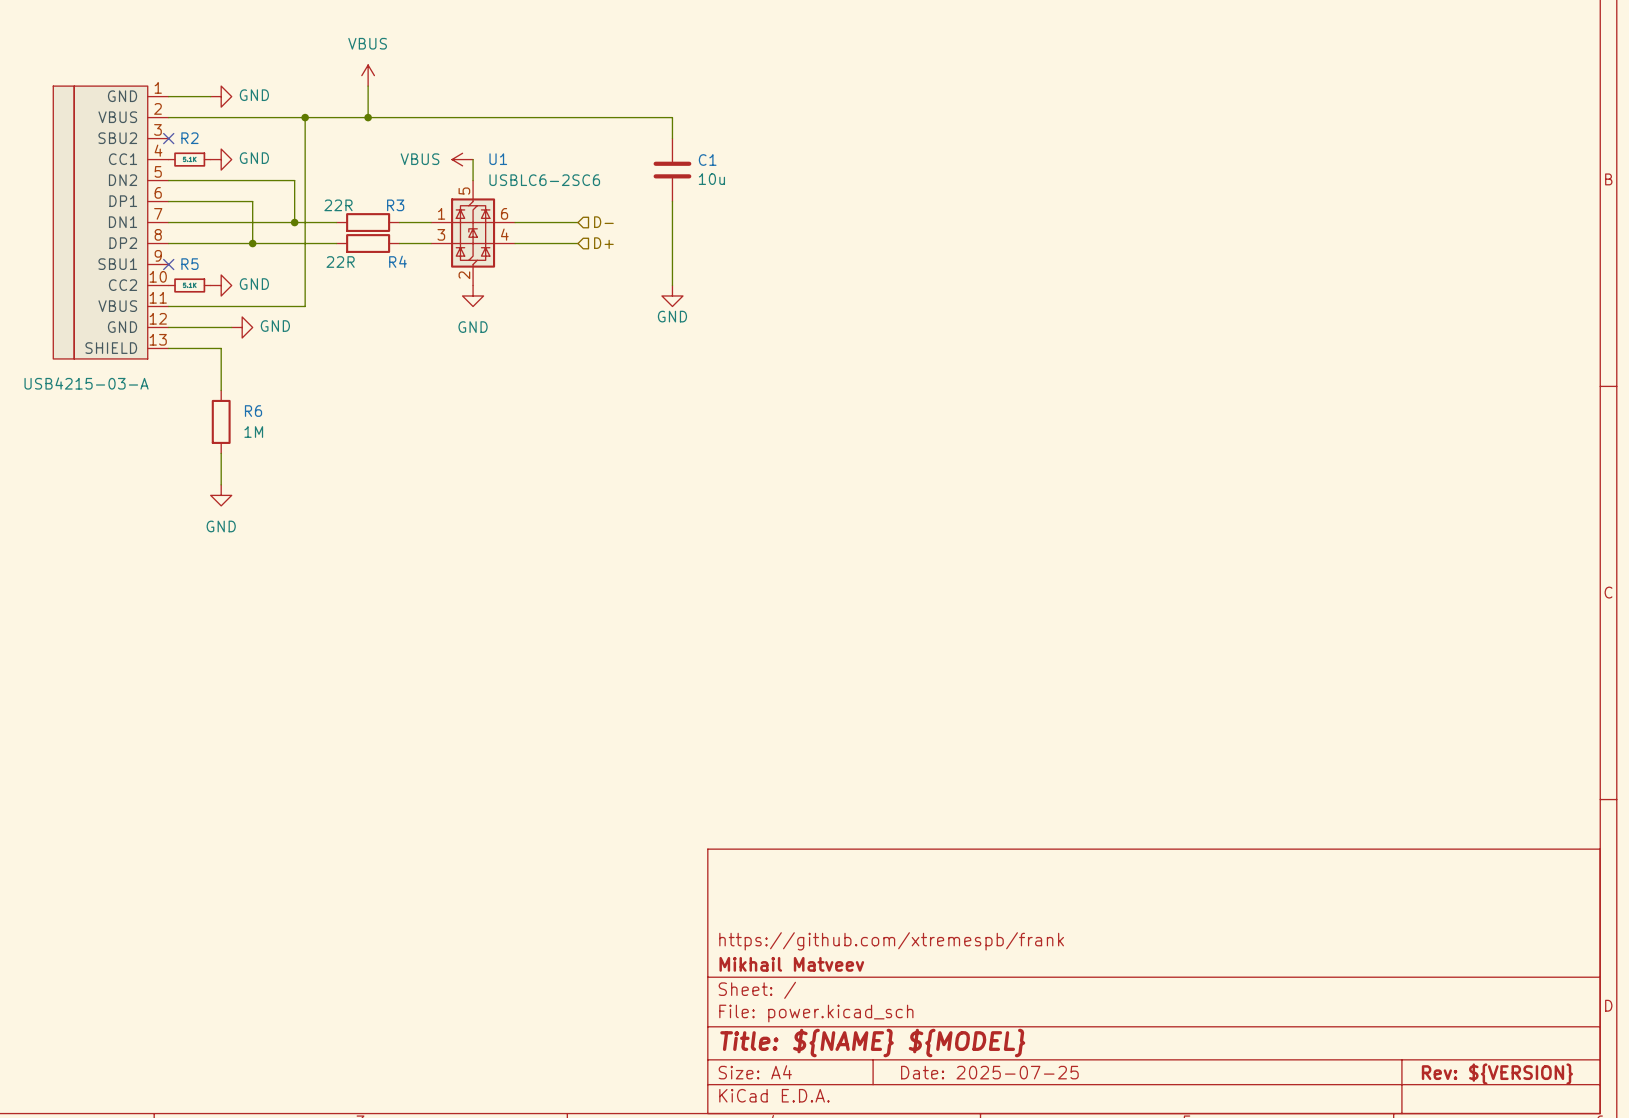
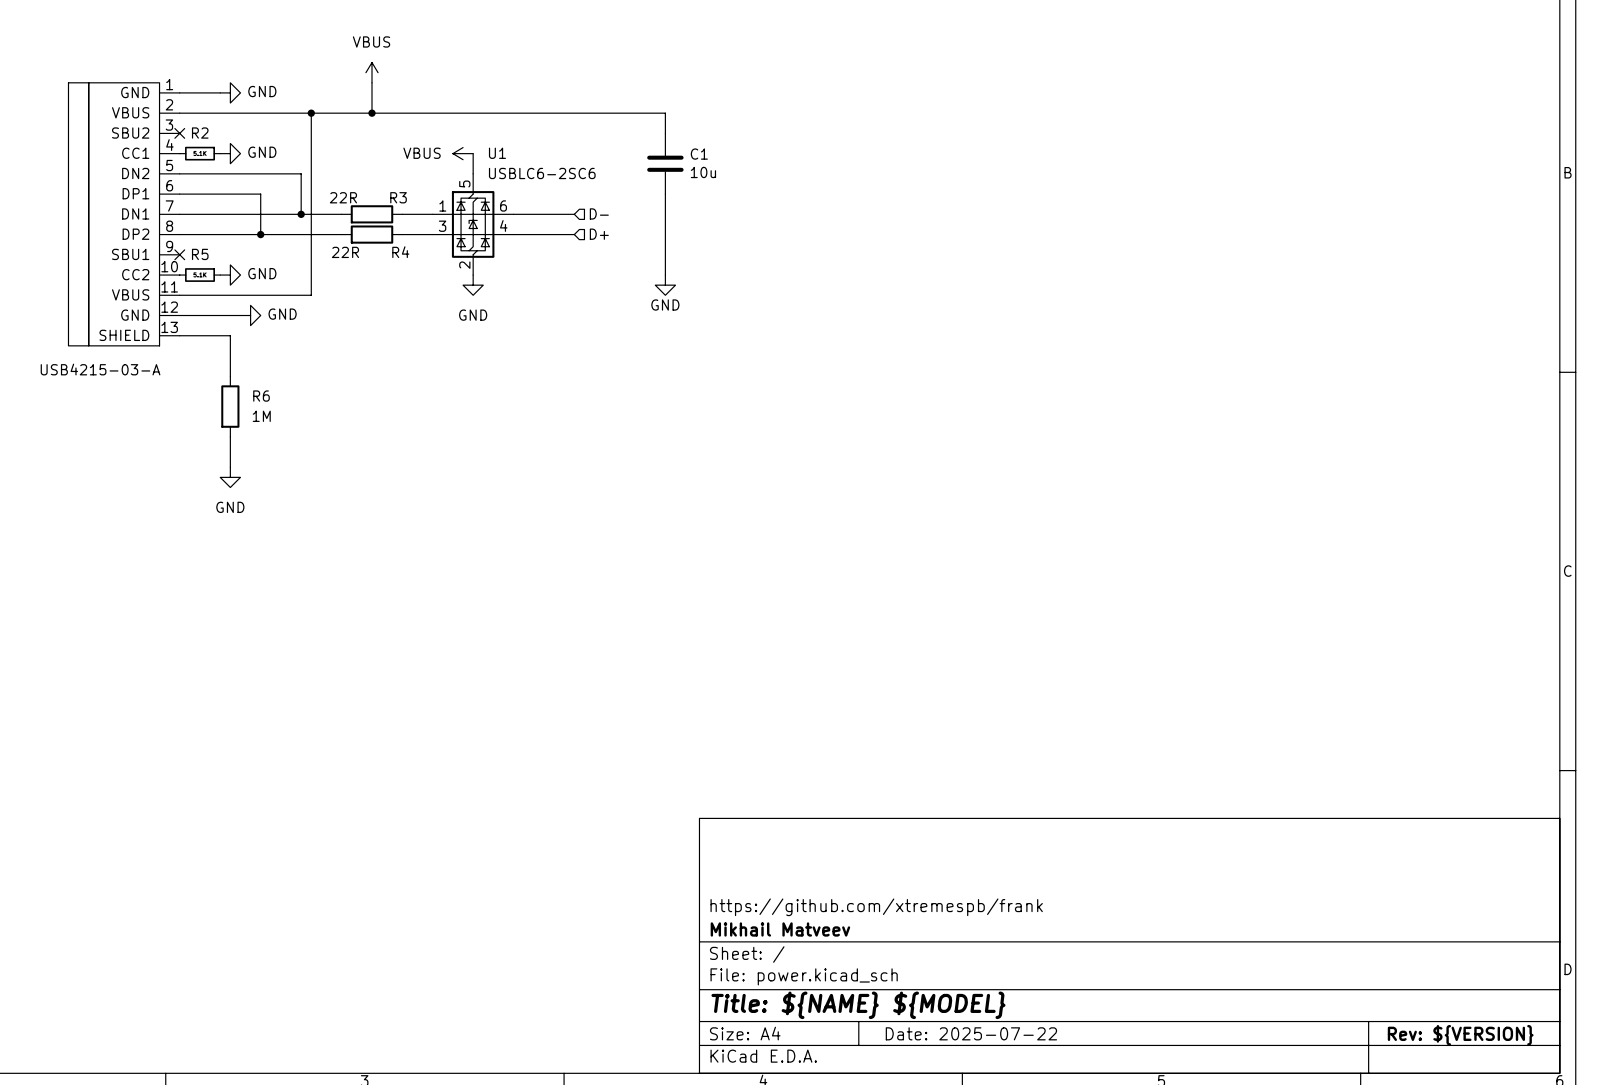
title block: Date: 2025-07-25 (989, 1072) -> Date: 2025-07-22 (971, 1033)

